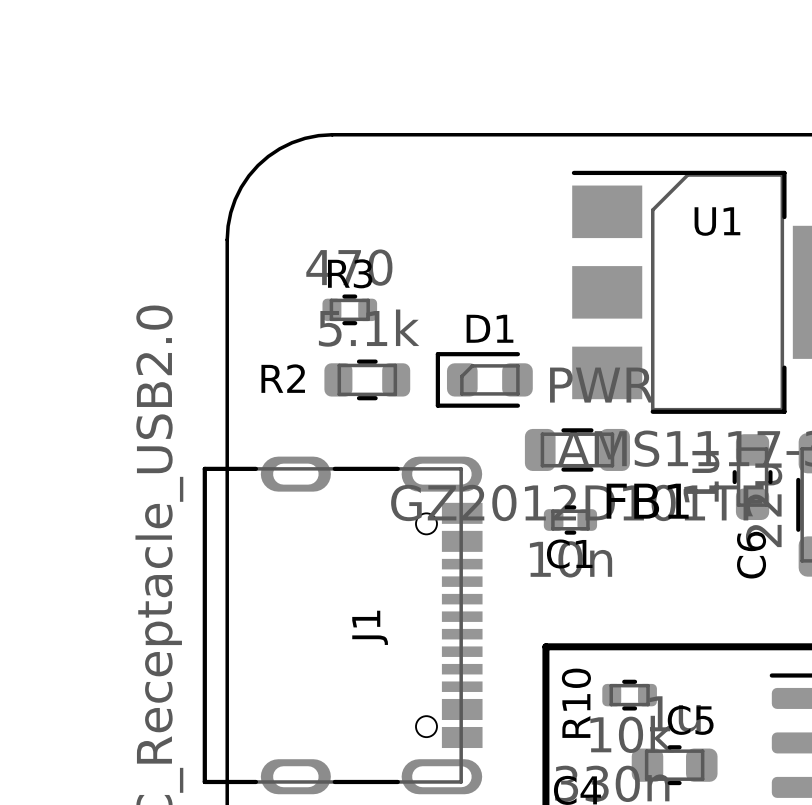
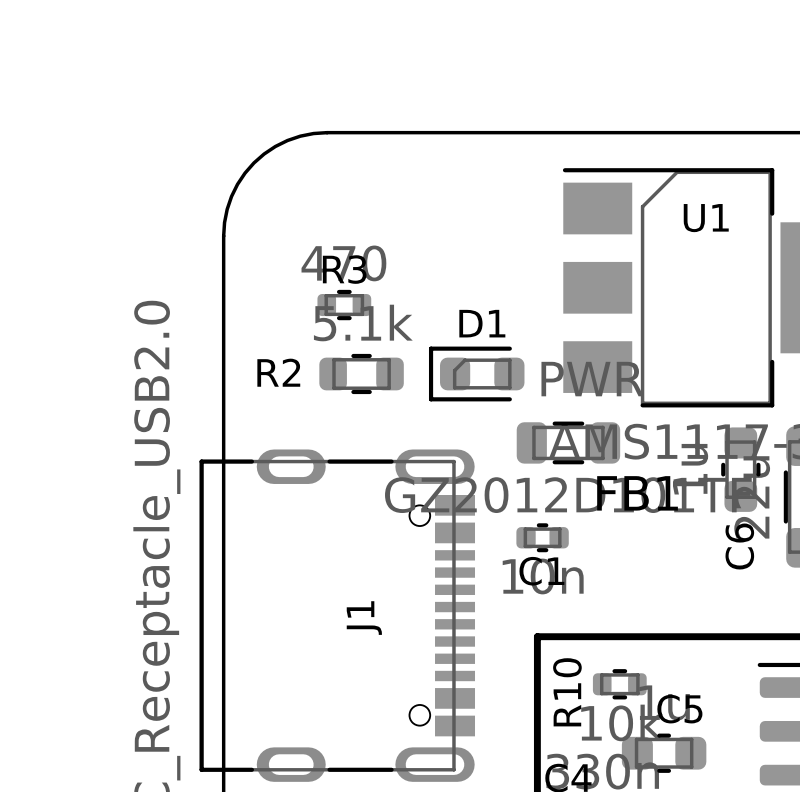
C1 position: (570, 520) -> (542, 537)

